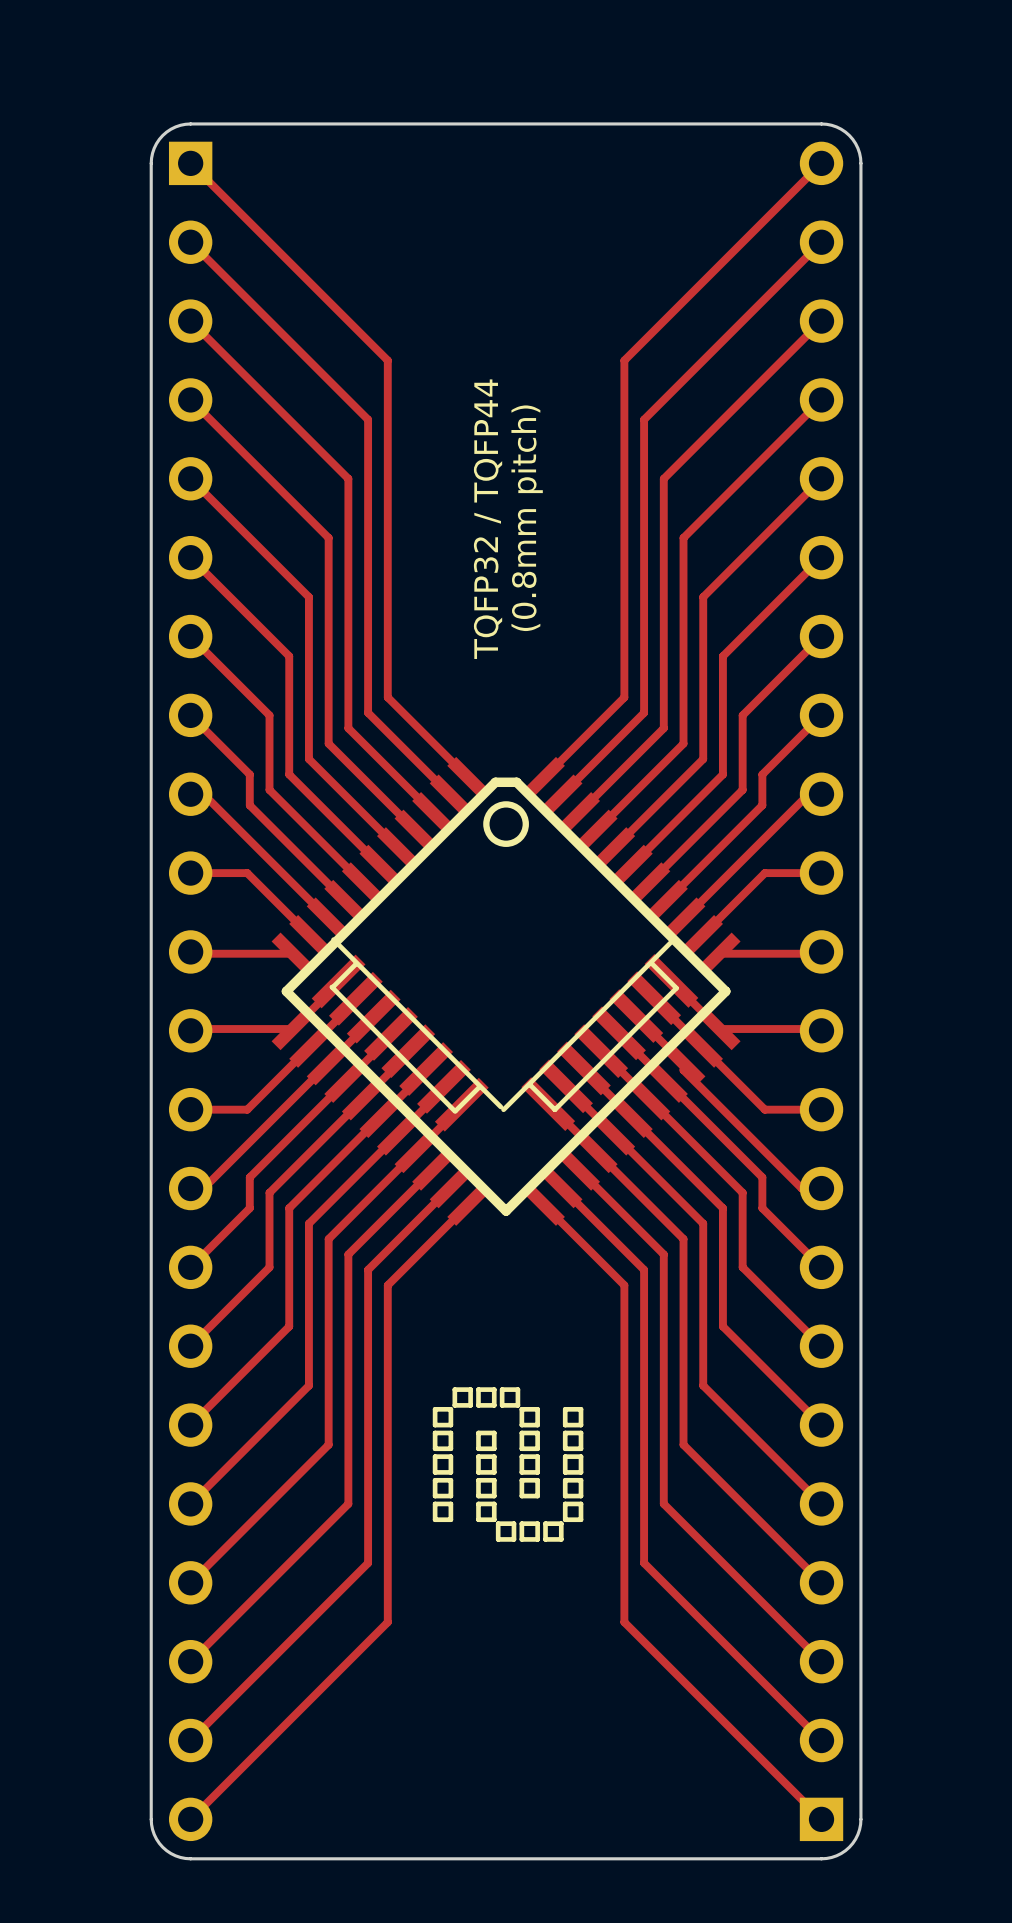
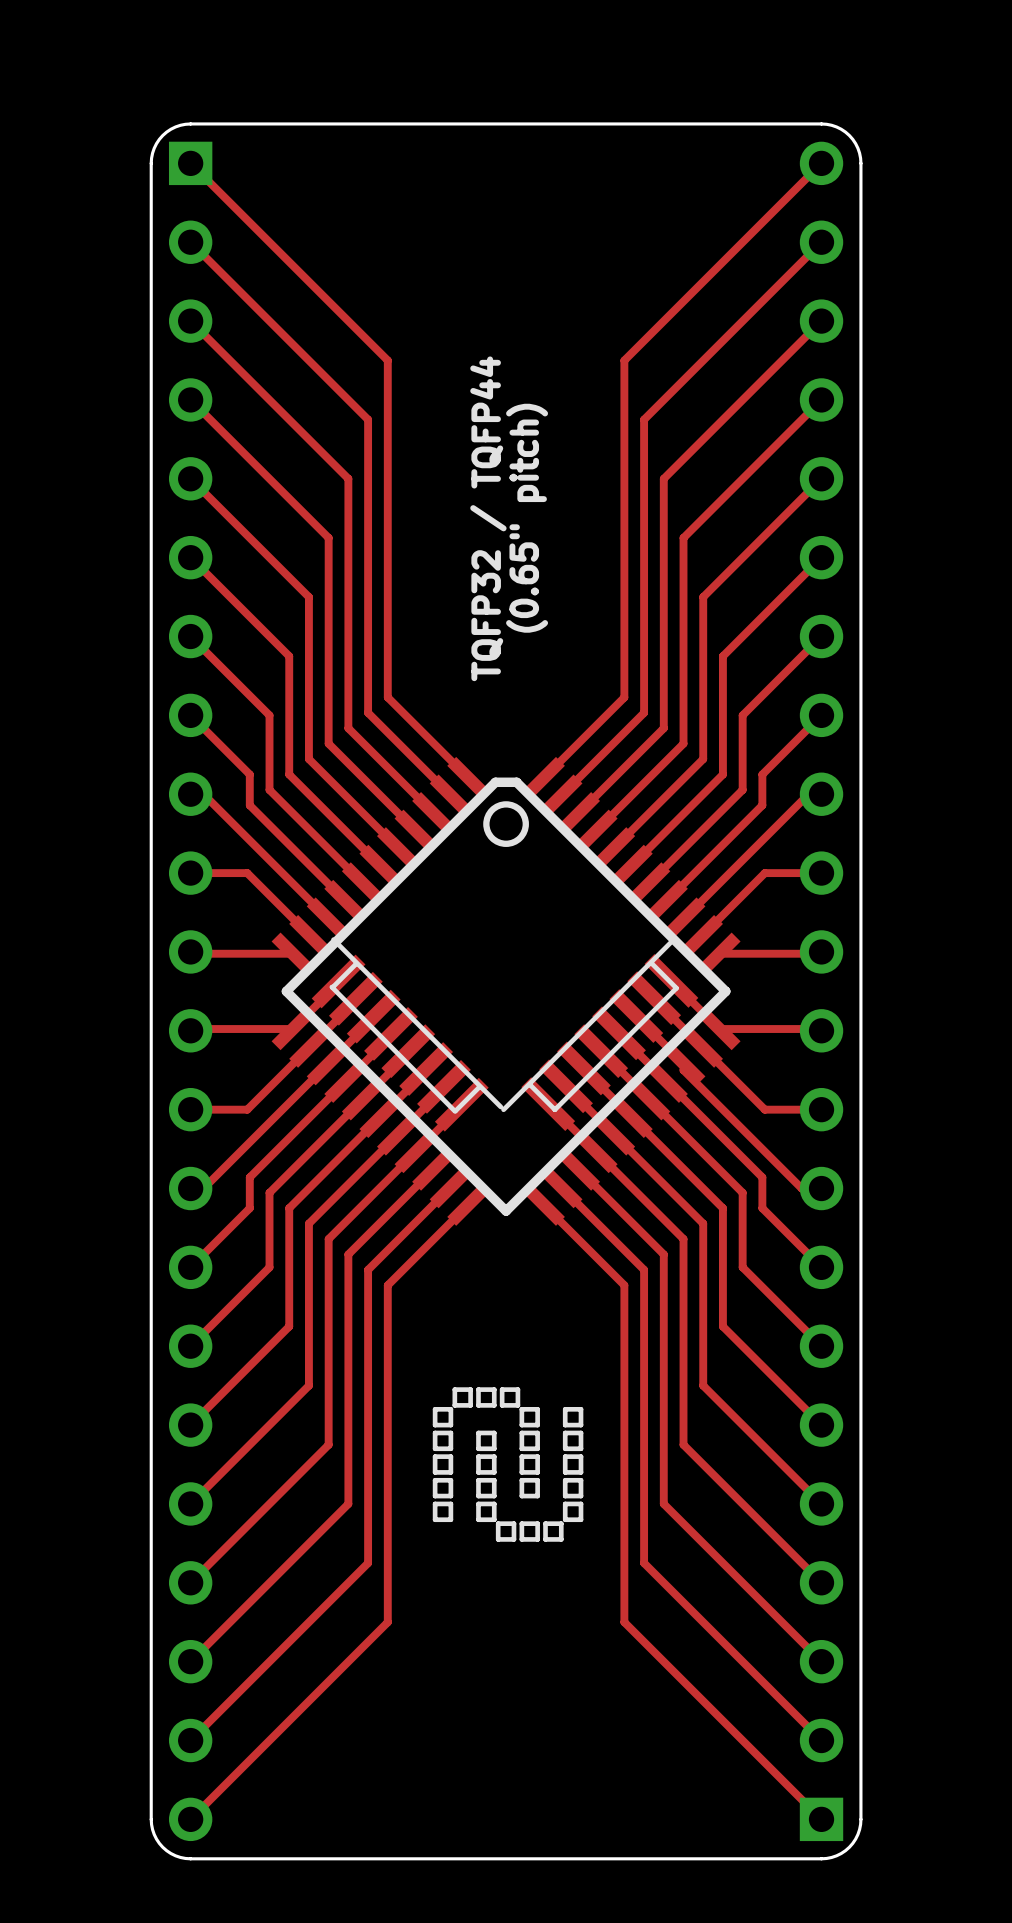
text: (0.8mm pitch) (527, 518) -> (0.65" pitch) (527, 518)

